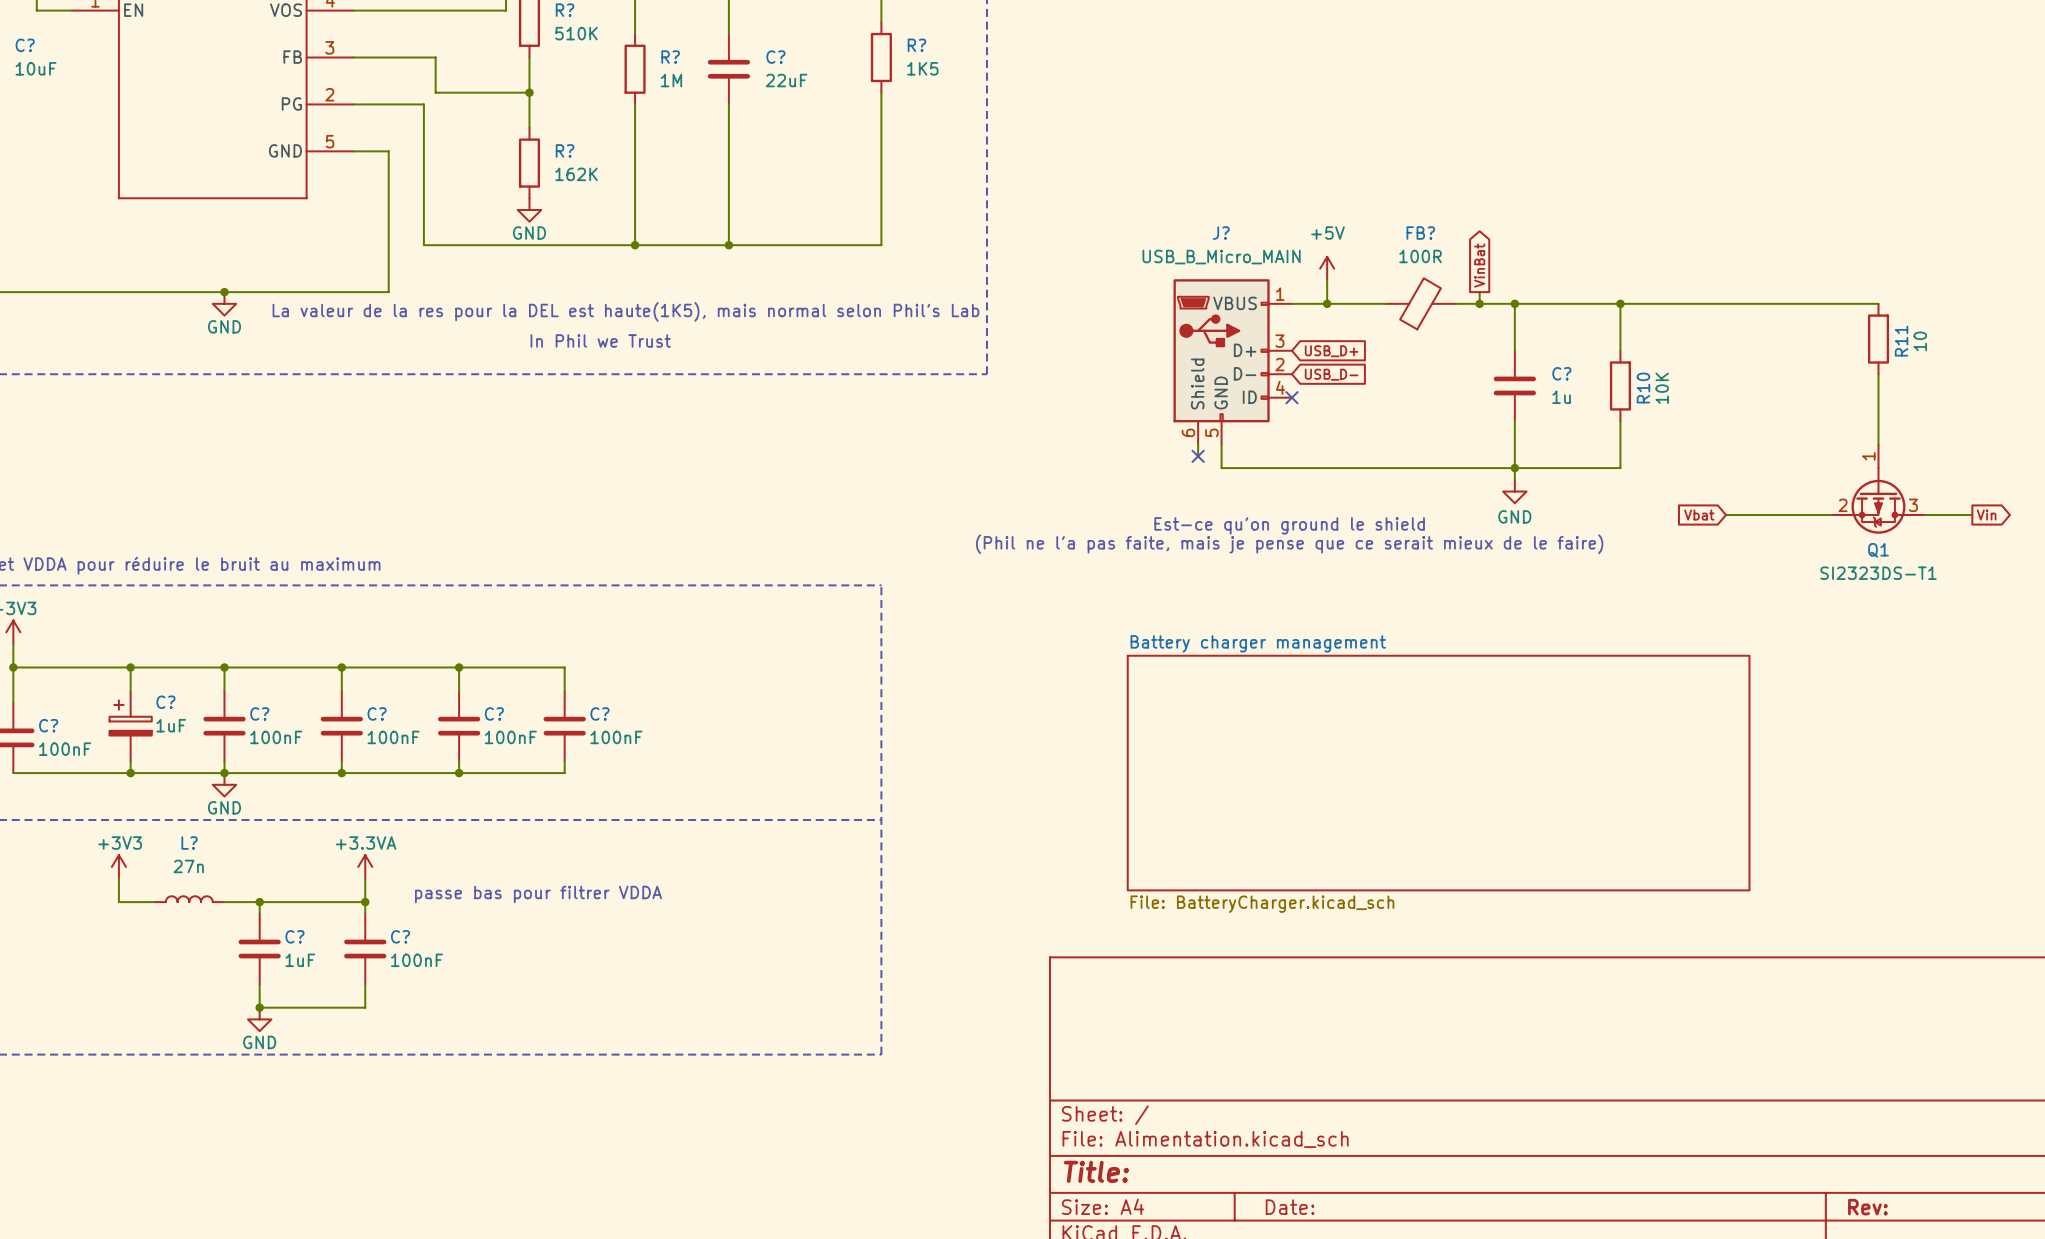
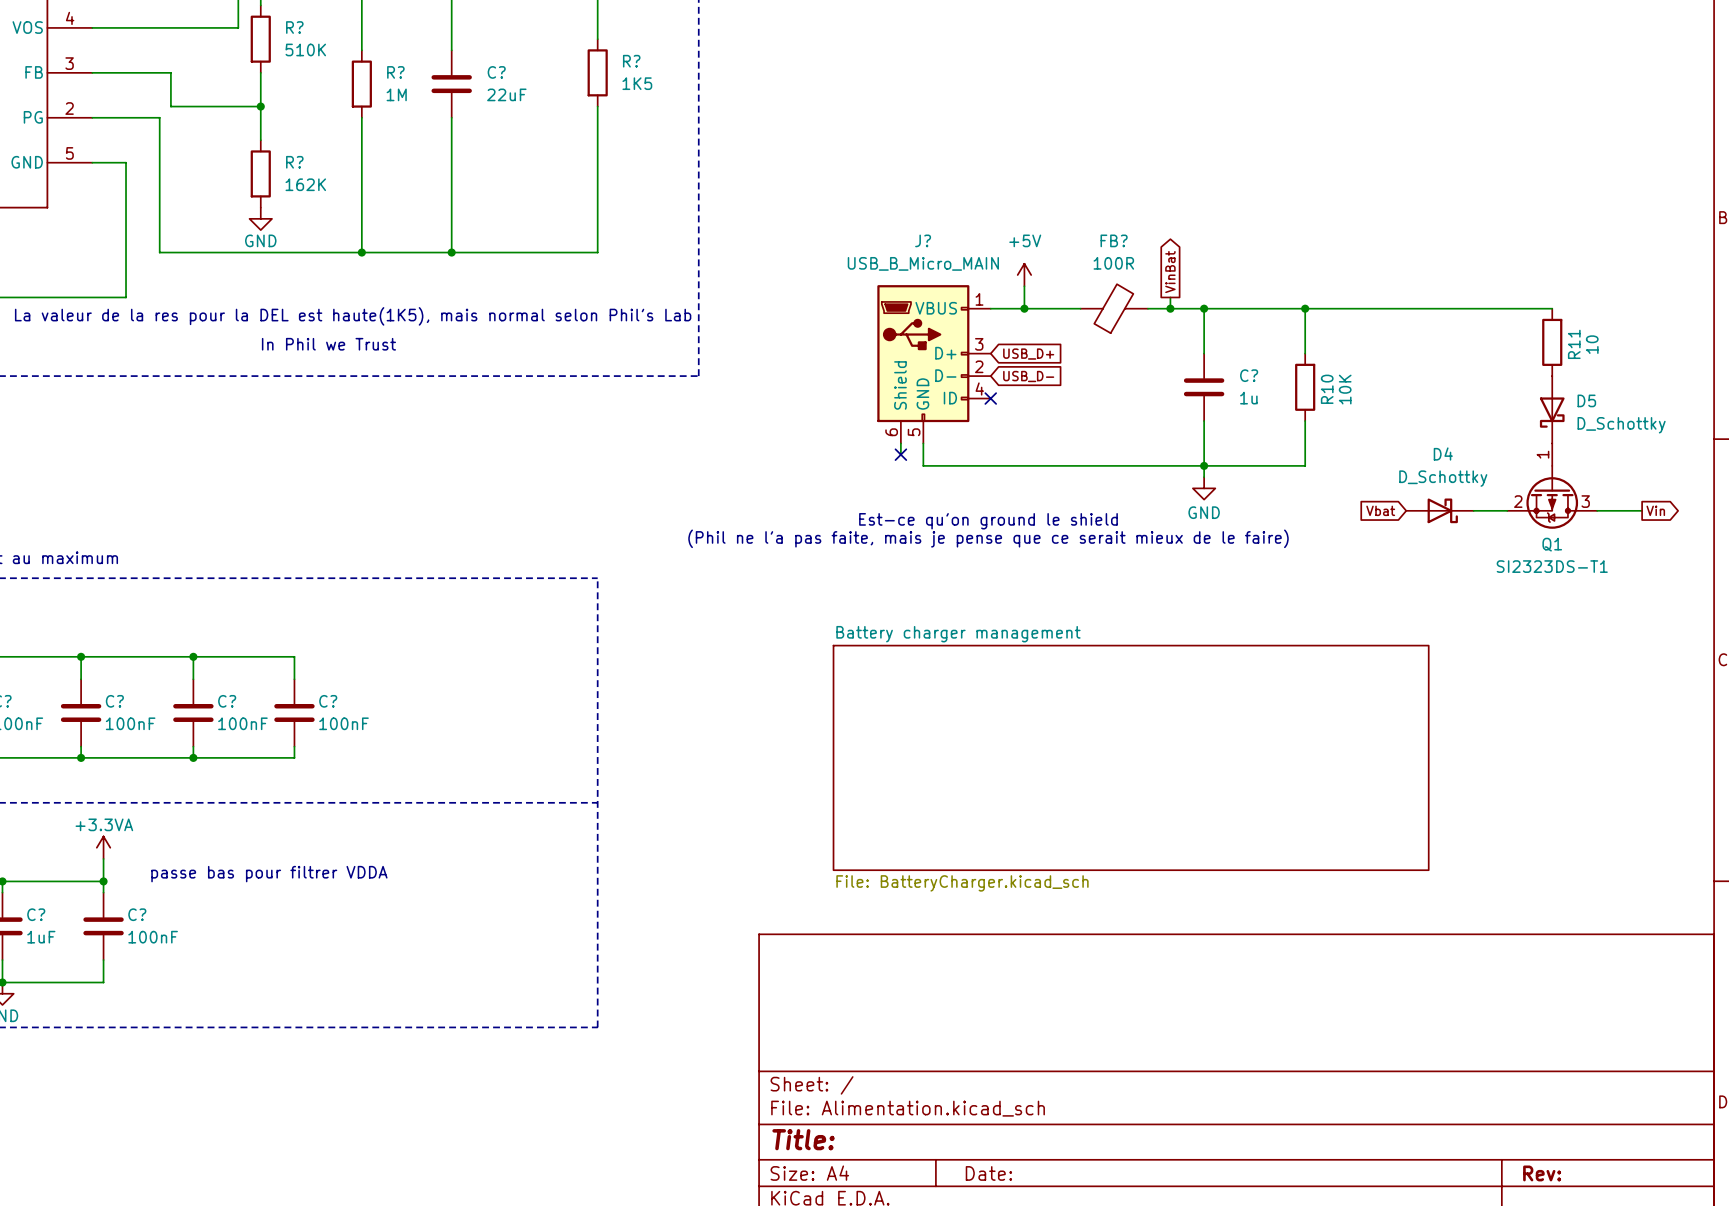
D5: none -> D_Schottky (1552, 409)
D4: none -> D_Schottky (1439, 510)

